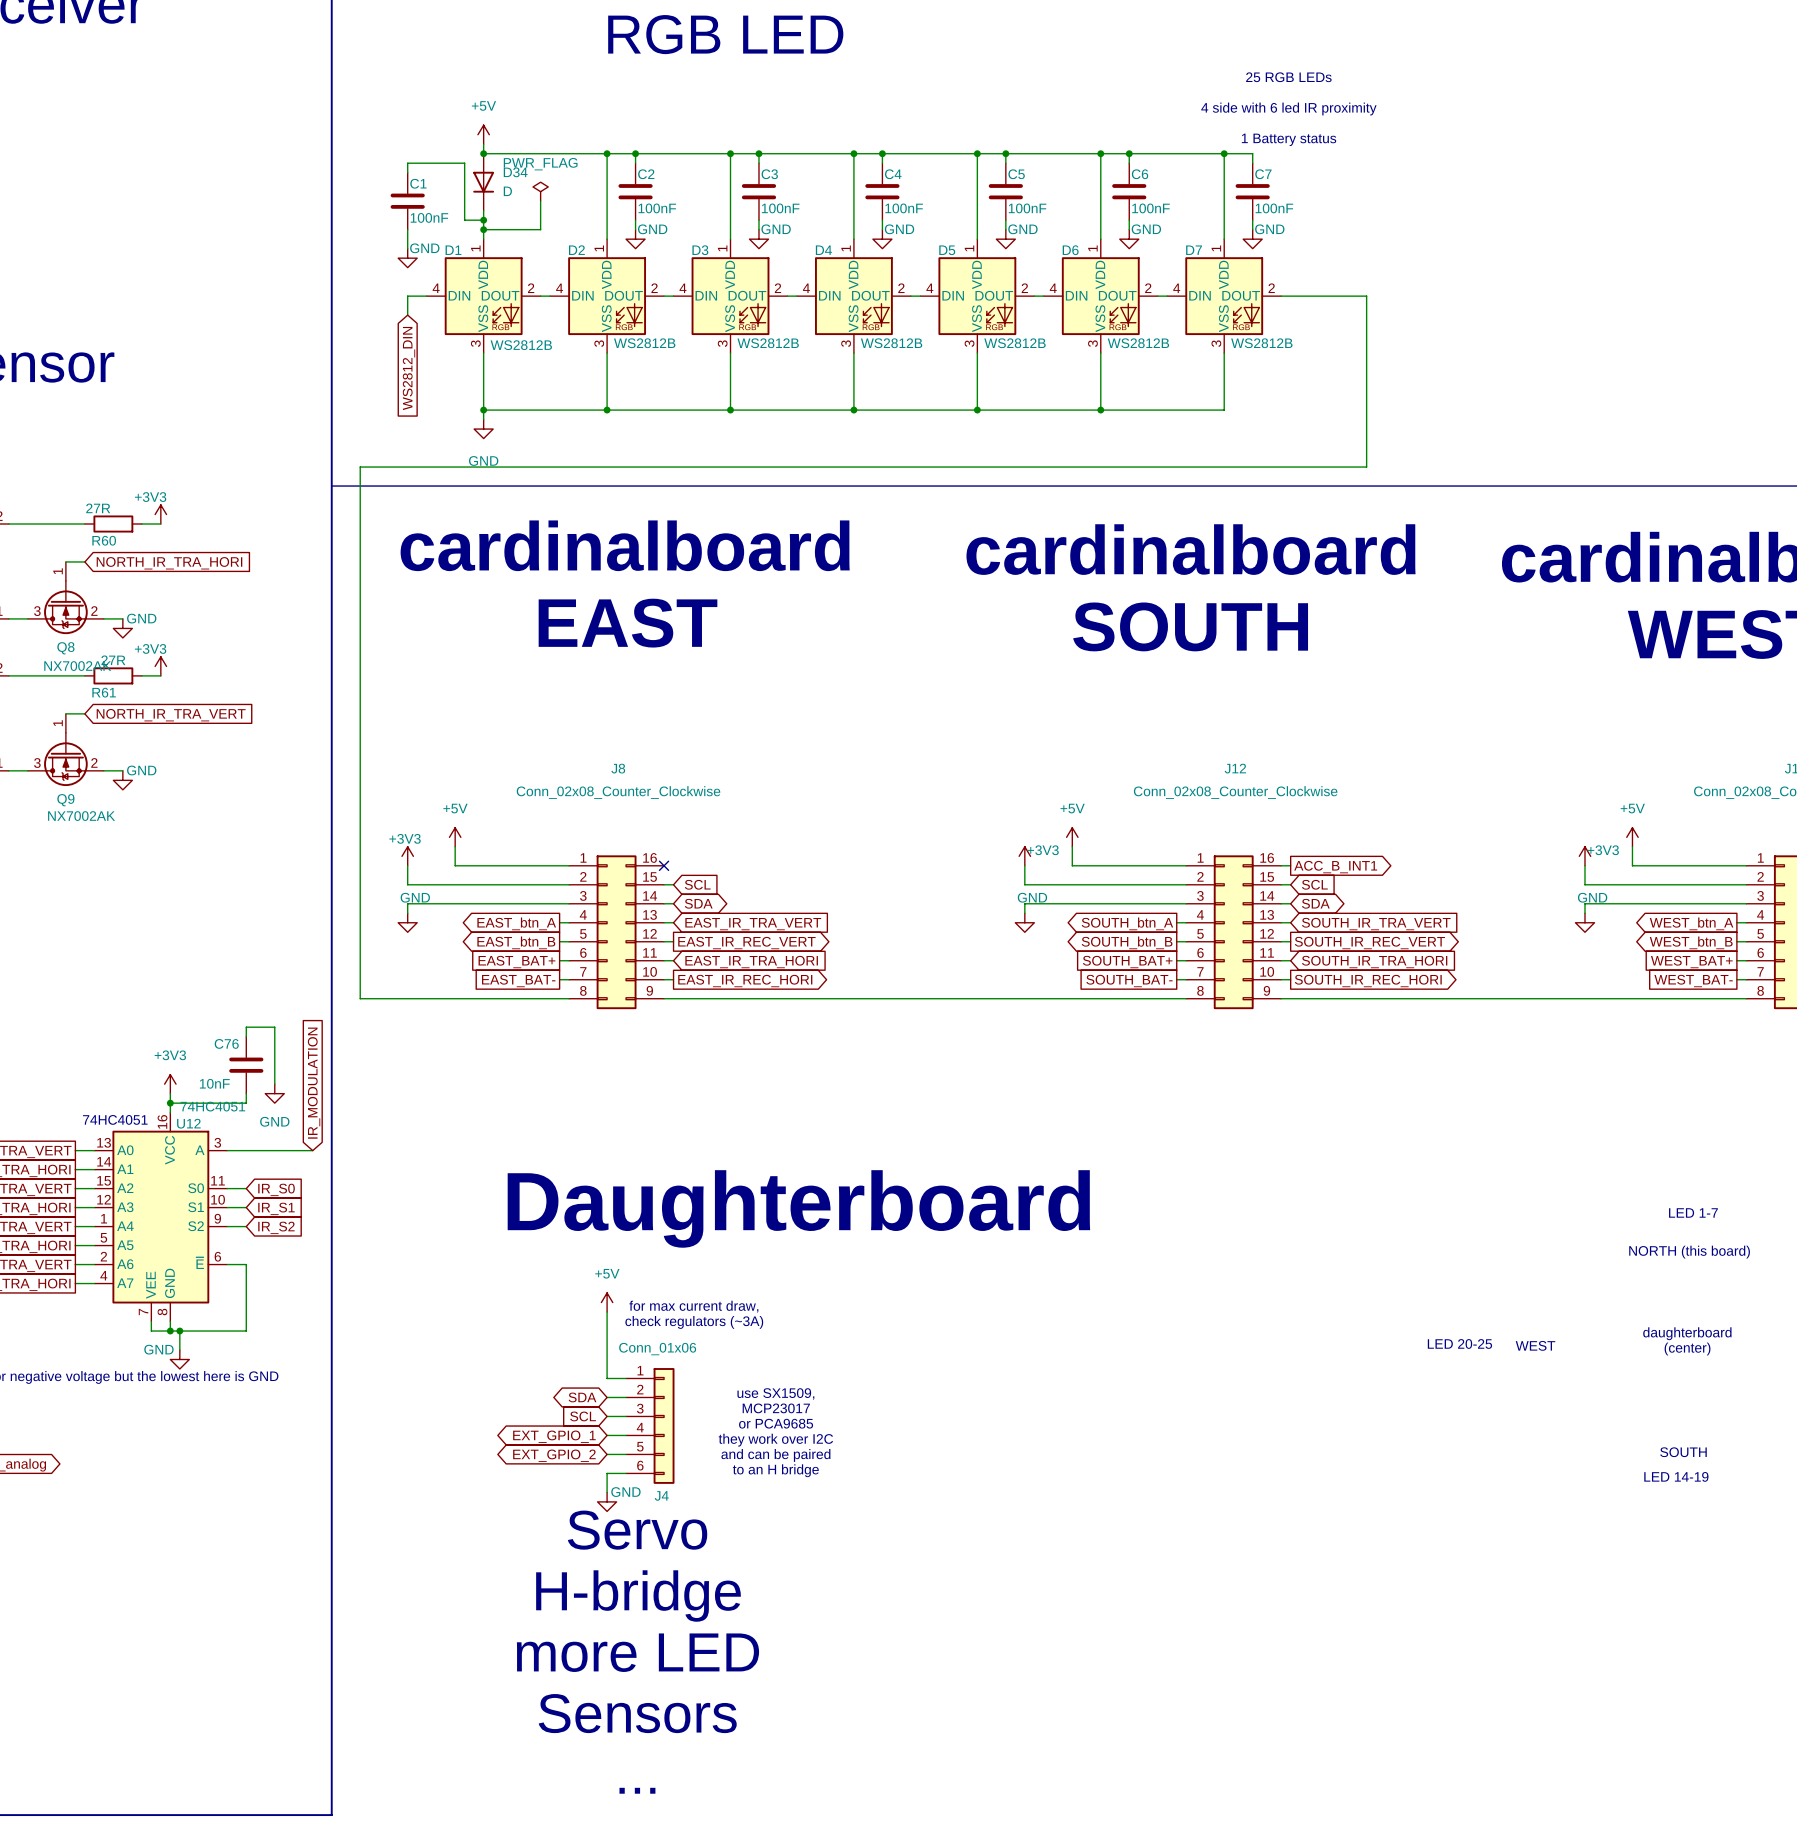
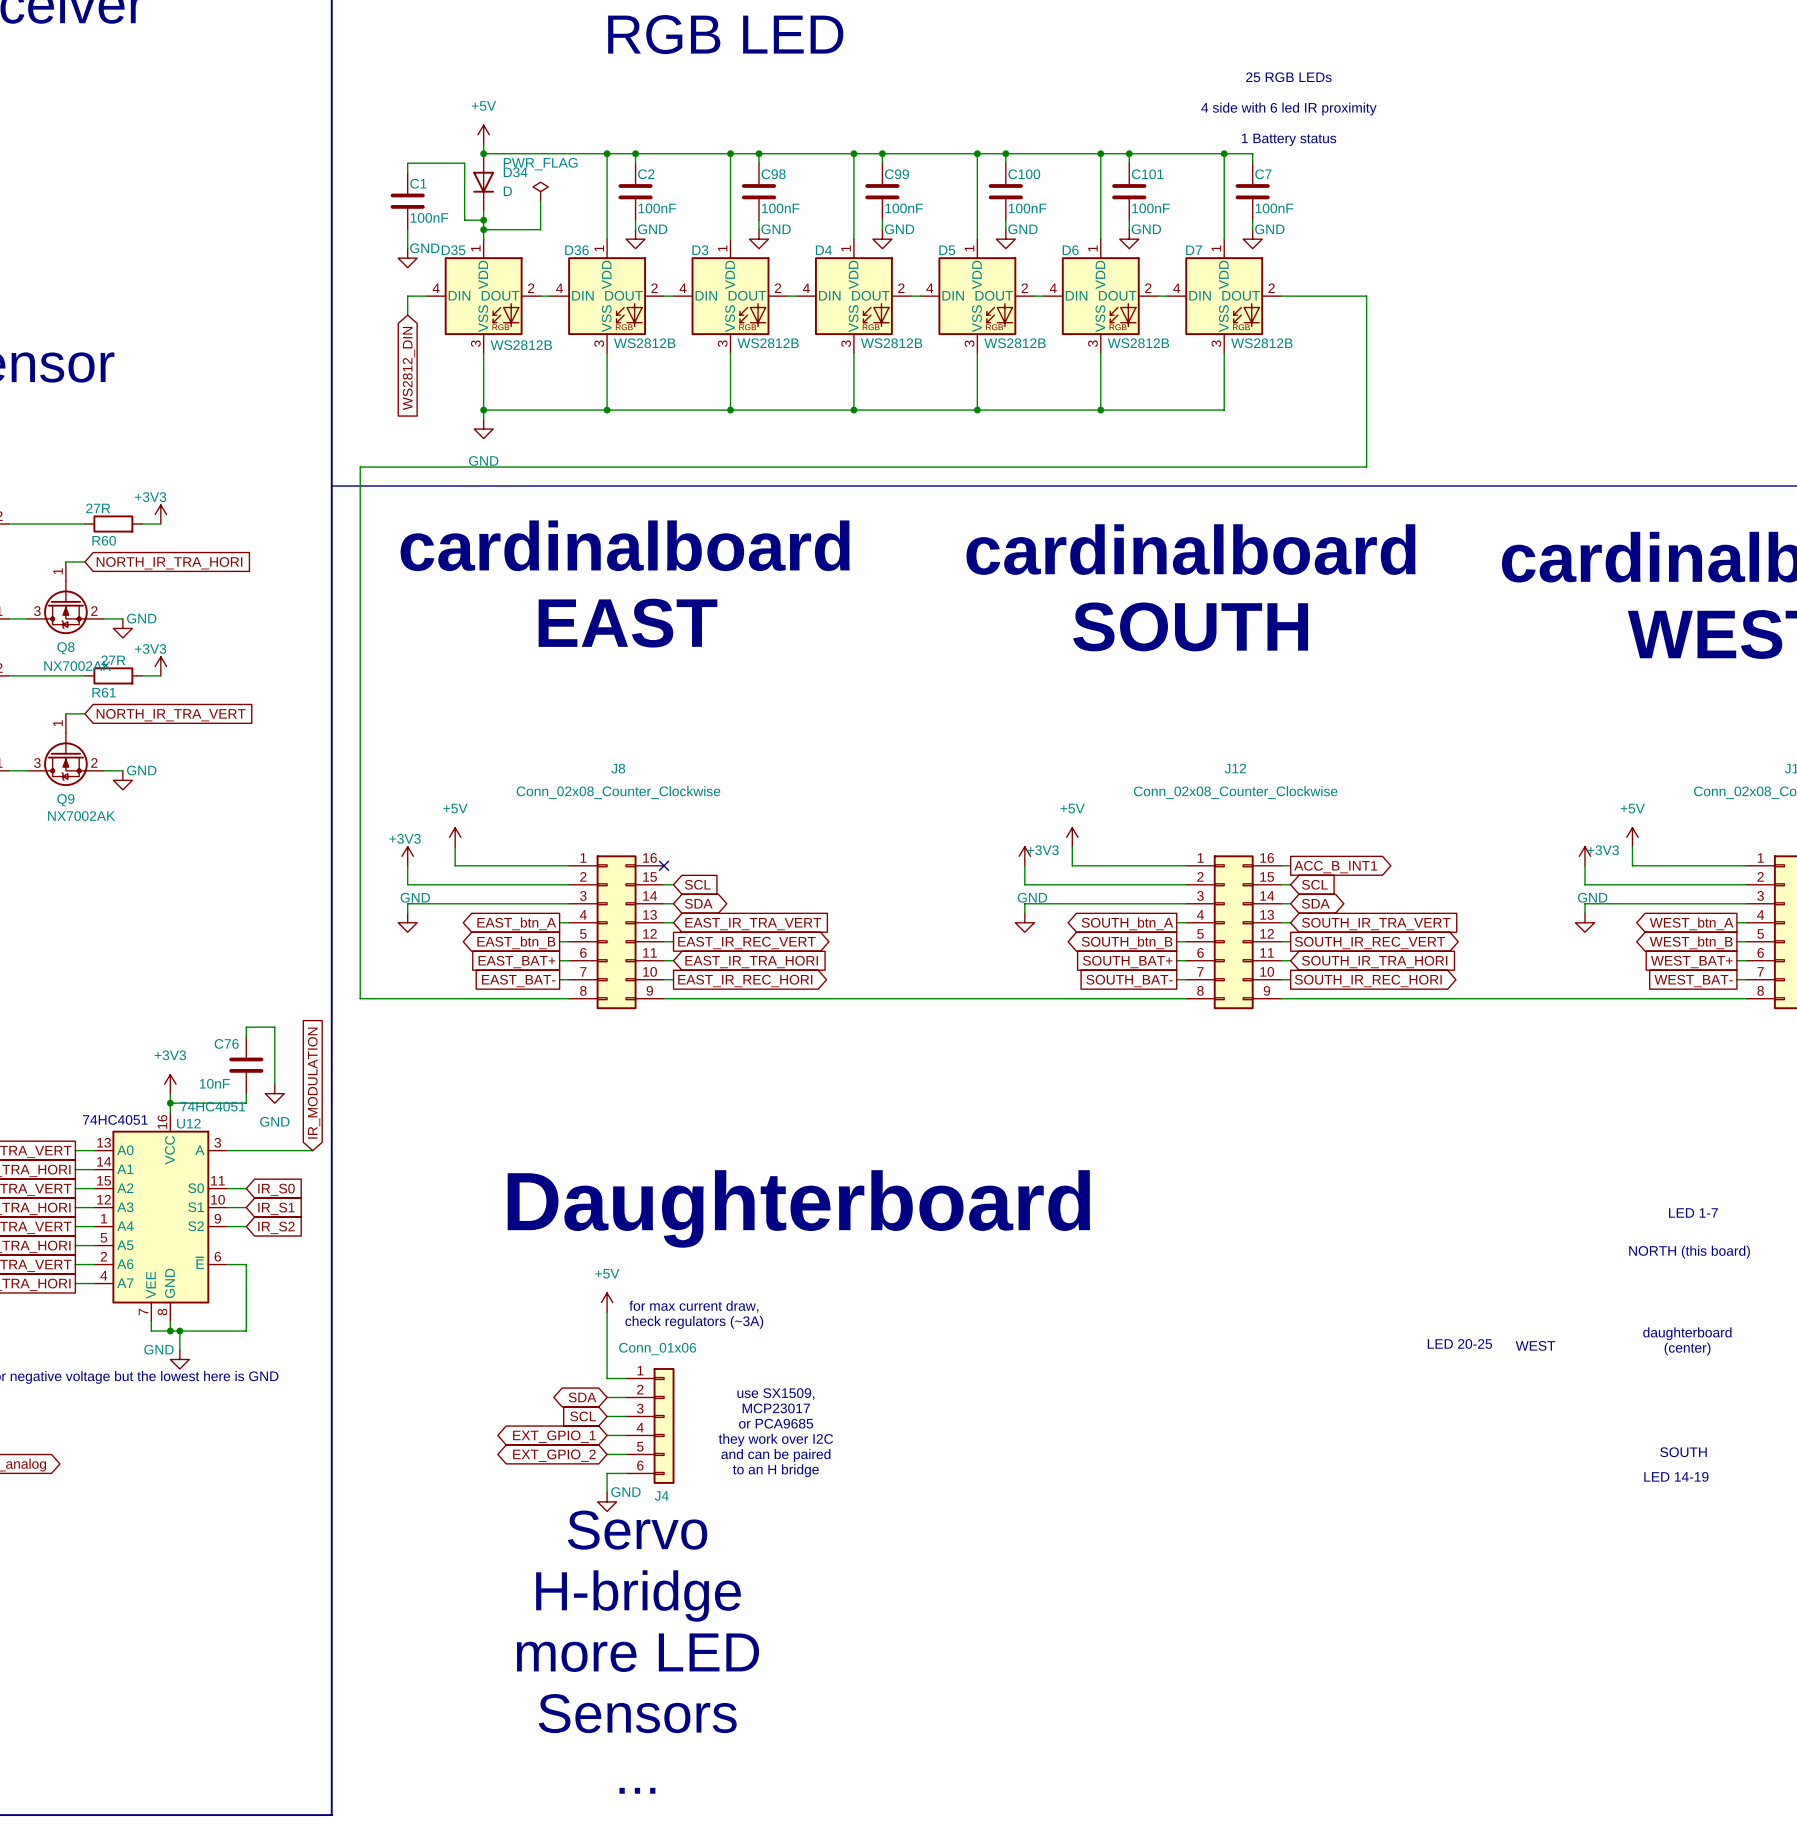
C3 name: C3 (769, 174) -> C98 (773, 174)
C4 name: C4 (893, 174) -> C99 (896, 174)
C5 name: C5 (1016, 174) -> C100 (1024, 174)
C6 name: C6 (1140, 174) -> C101 (1147, 174)
D1 name: D1 (453, 250) -> D35 (453, 250)
D2 name: D2 (576, 250) -> D36 (576, 250)

